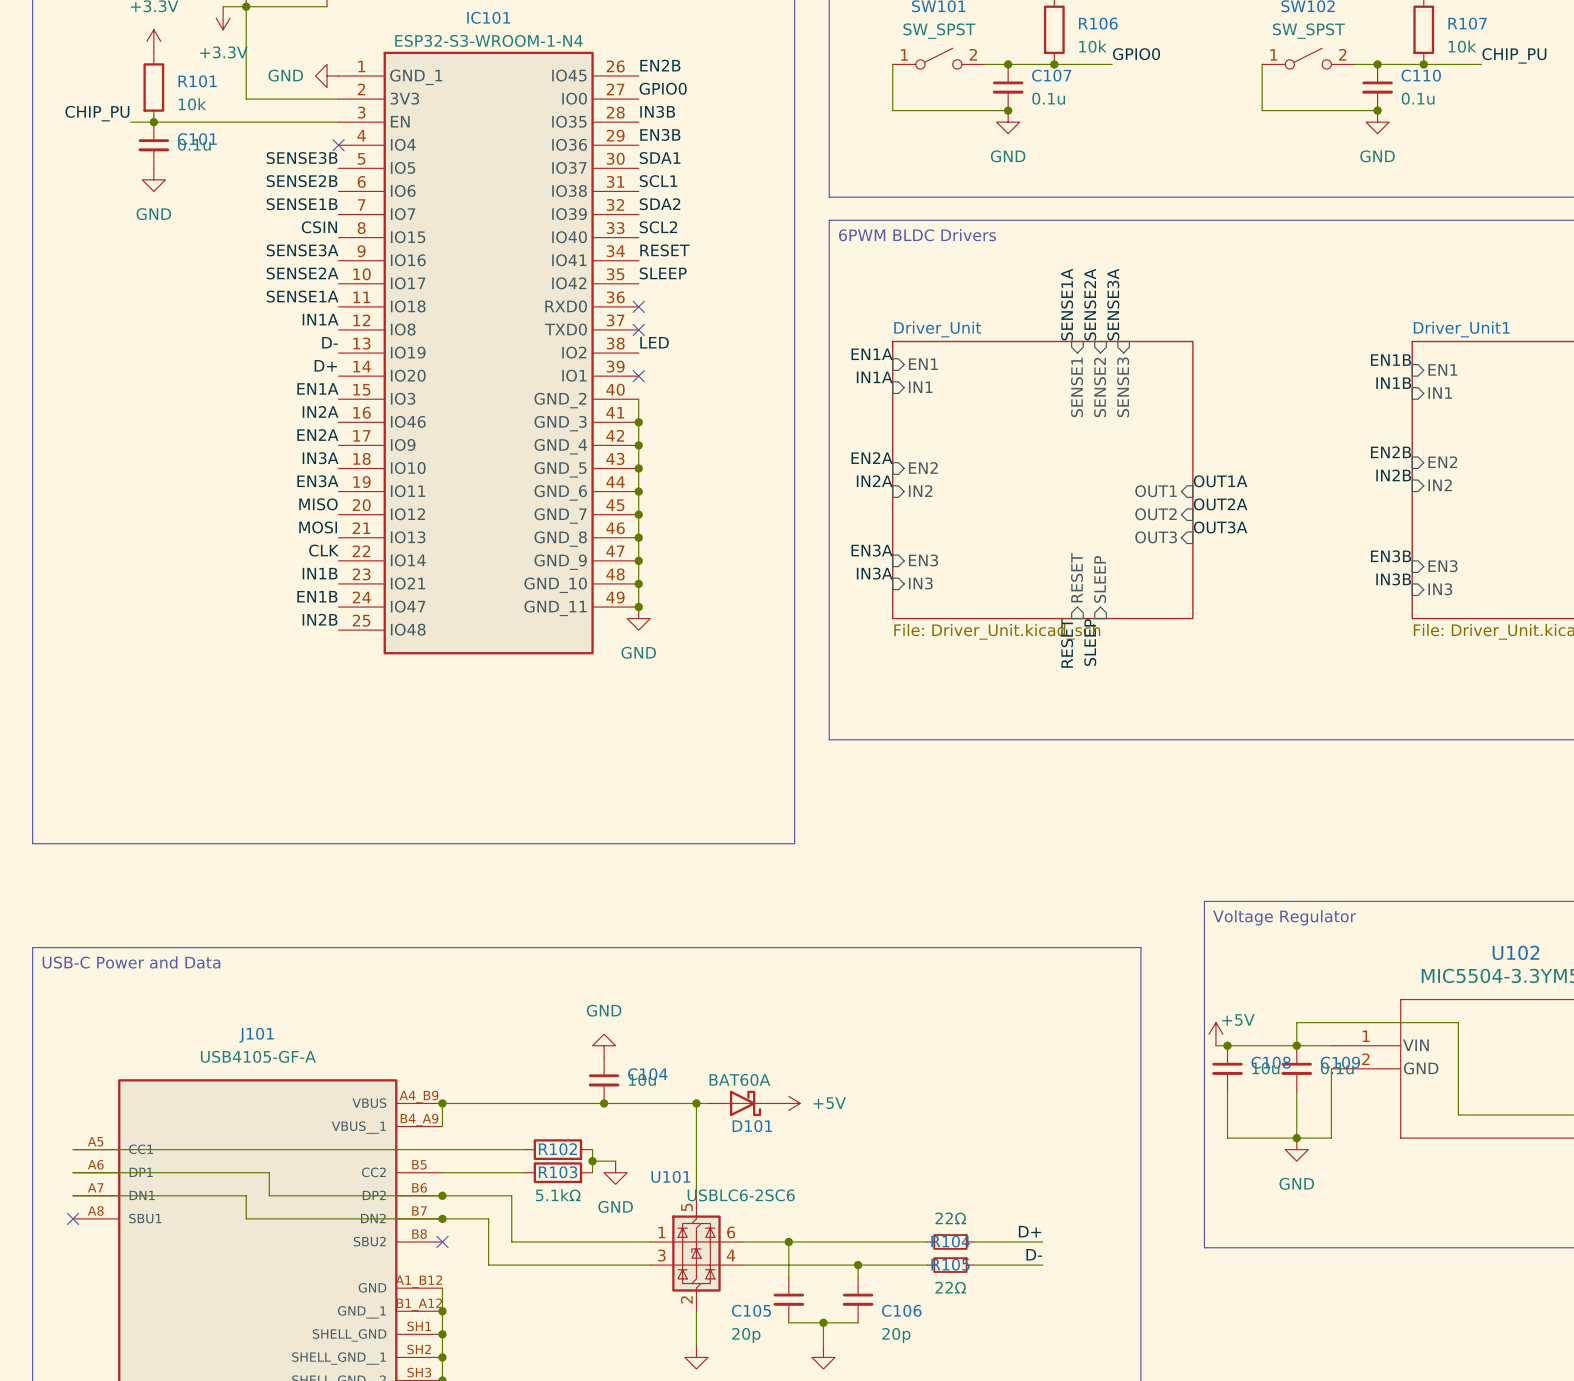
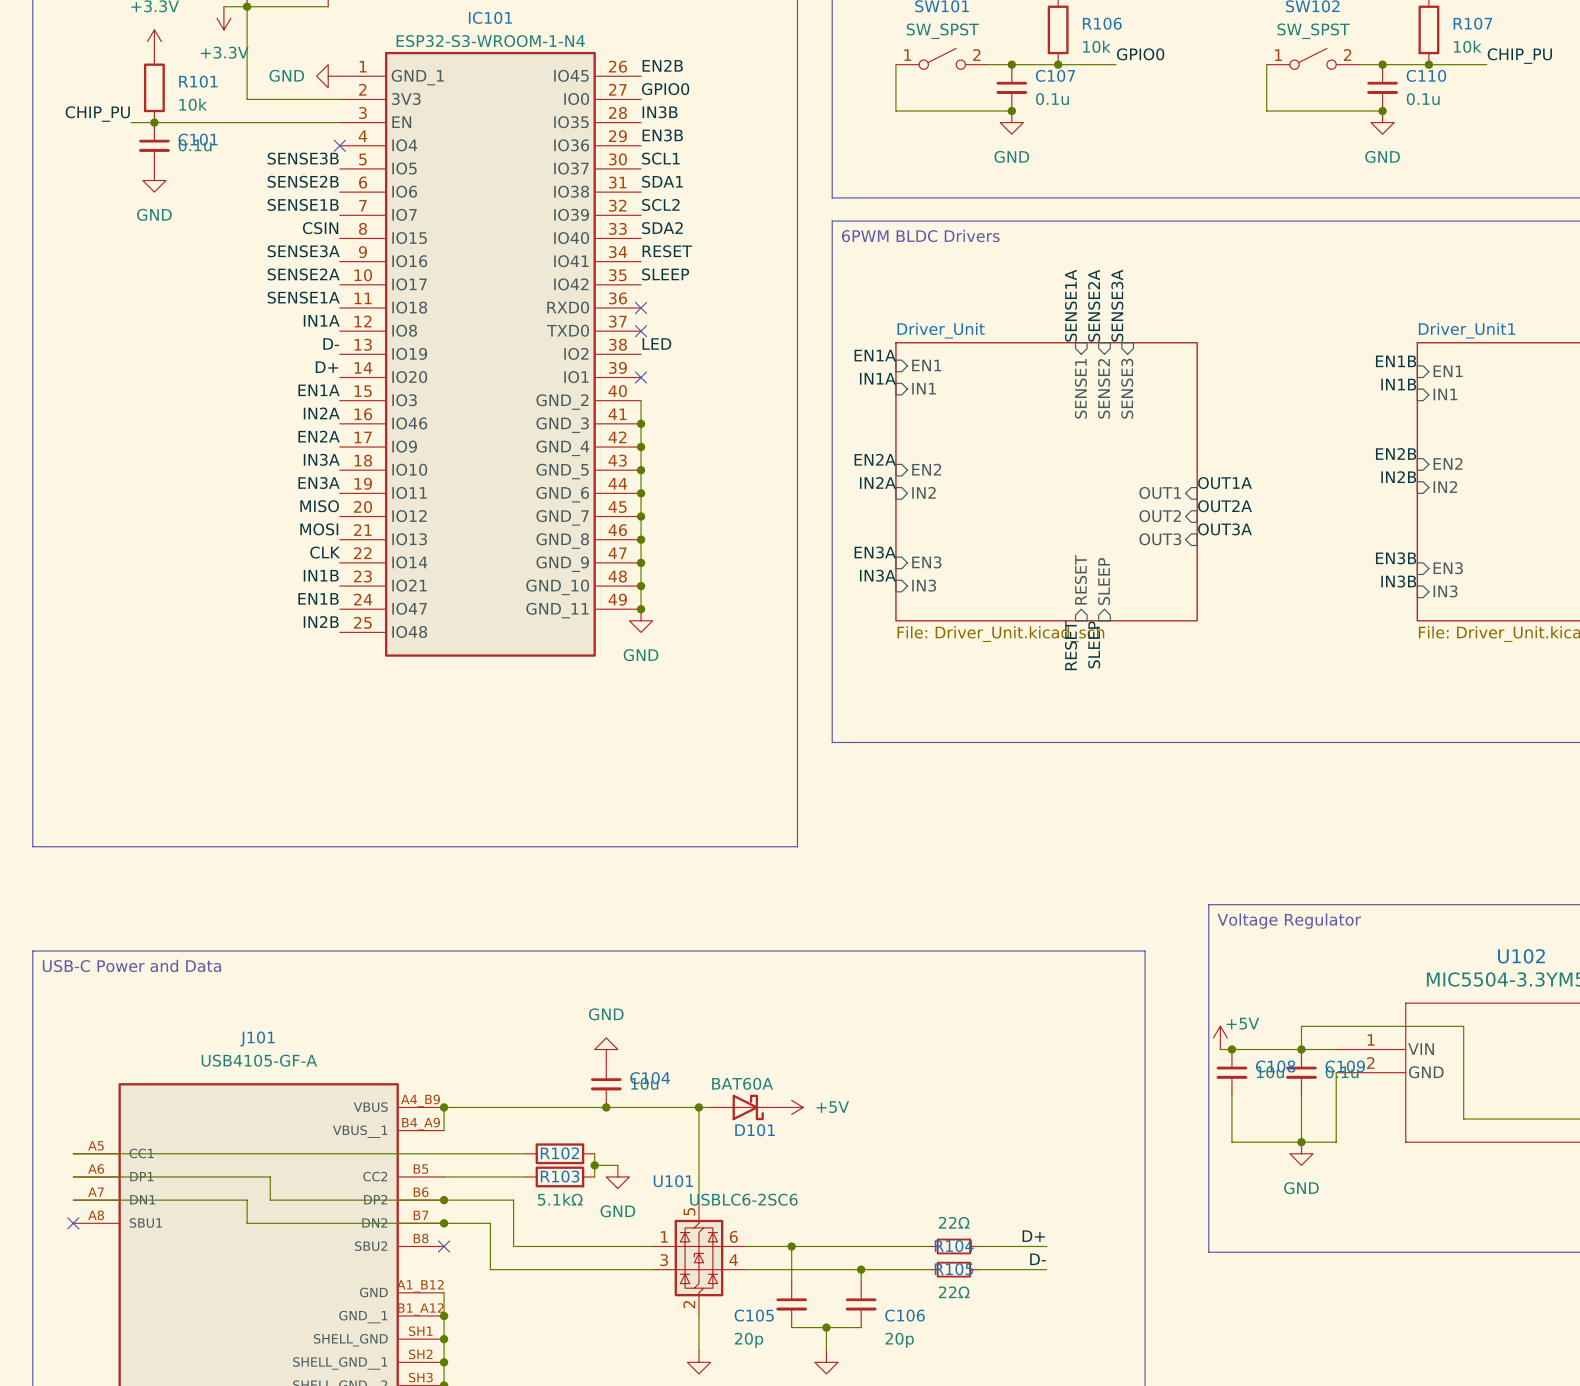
label: SDA1 (660, 158) -> SCL1 (660, 158)
label: SCL1 (658, 181) -> SDA1 (662, 181)
label: SDA2 (660, 204) -> SCL2 (660, 204)
label: SCL2 (658, 227) -> SDA2 (662, 228)

